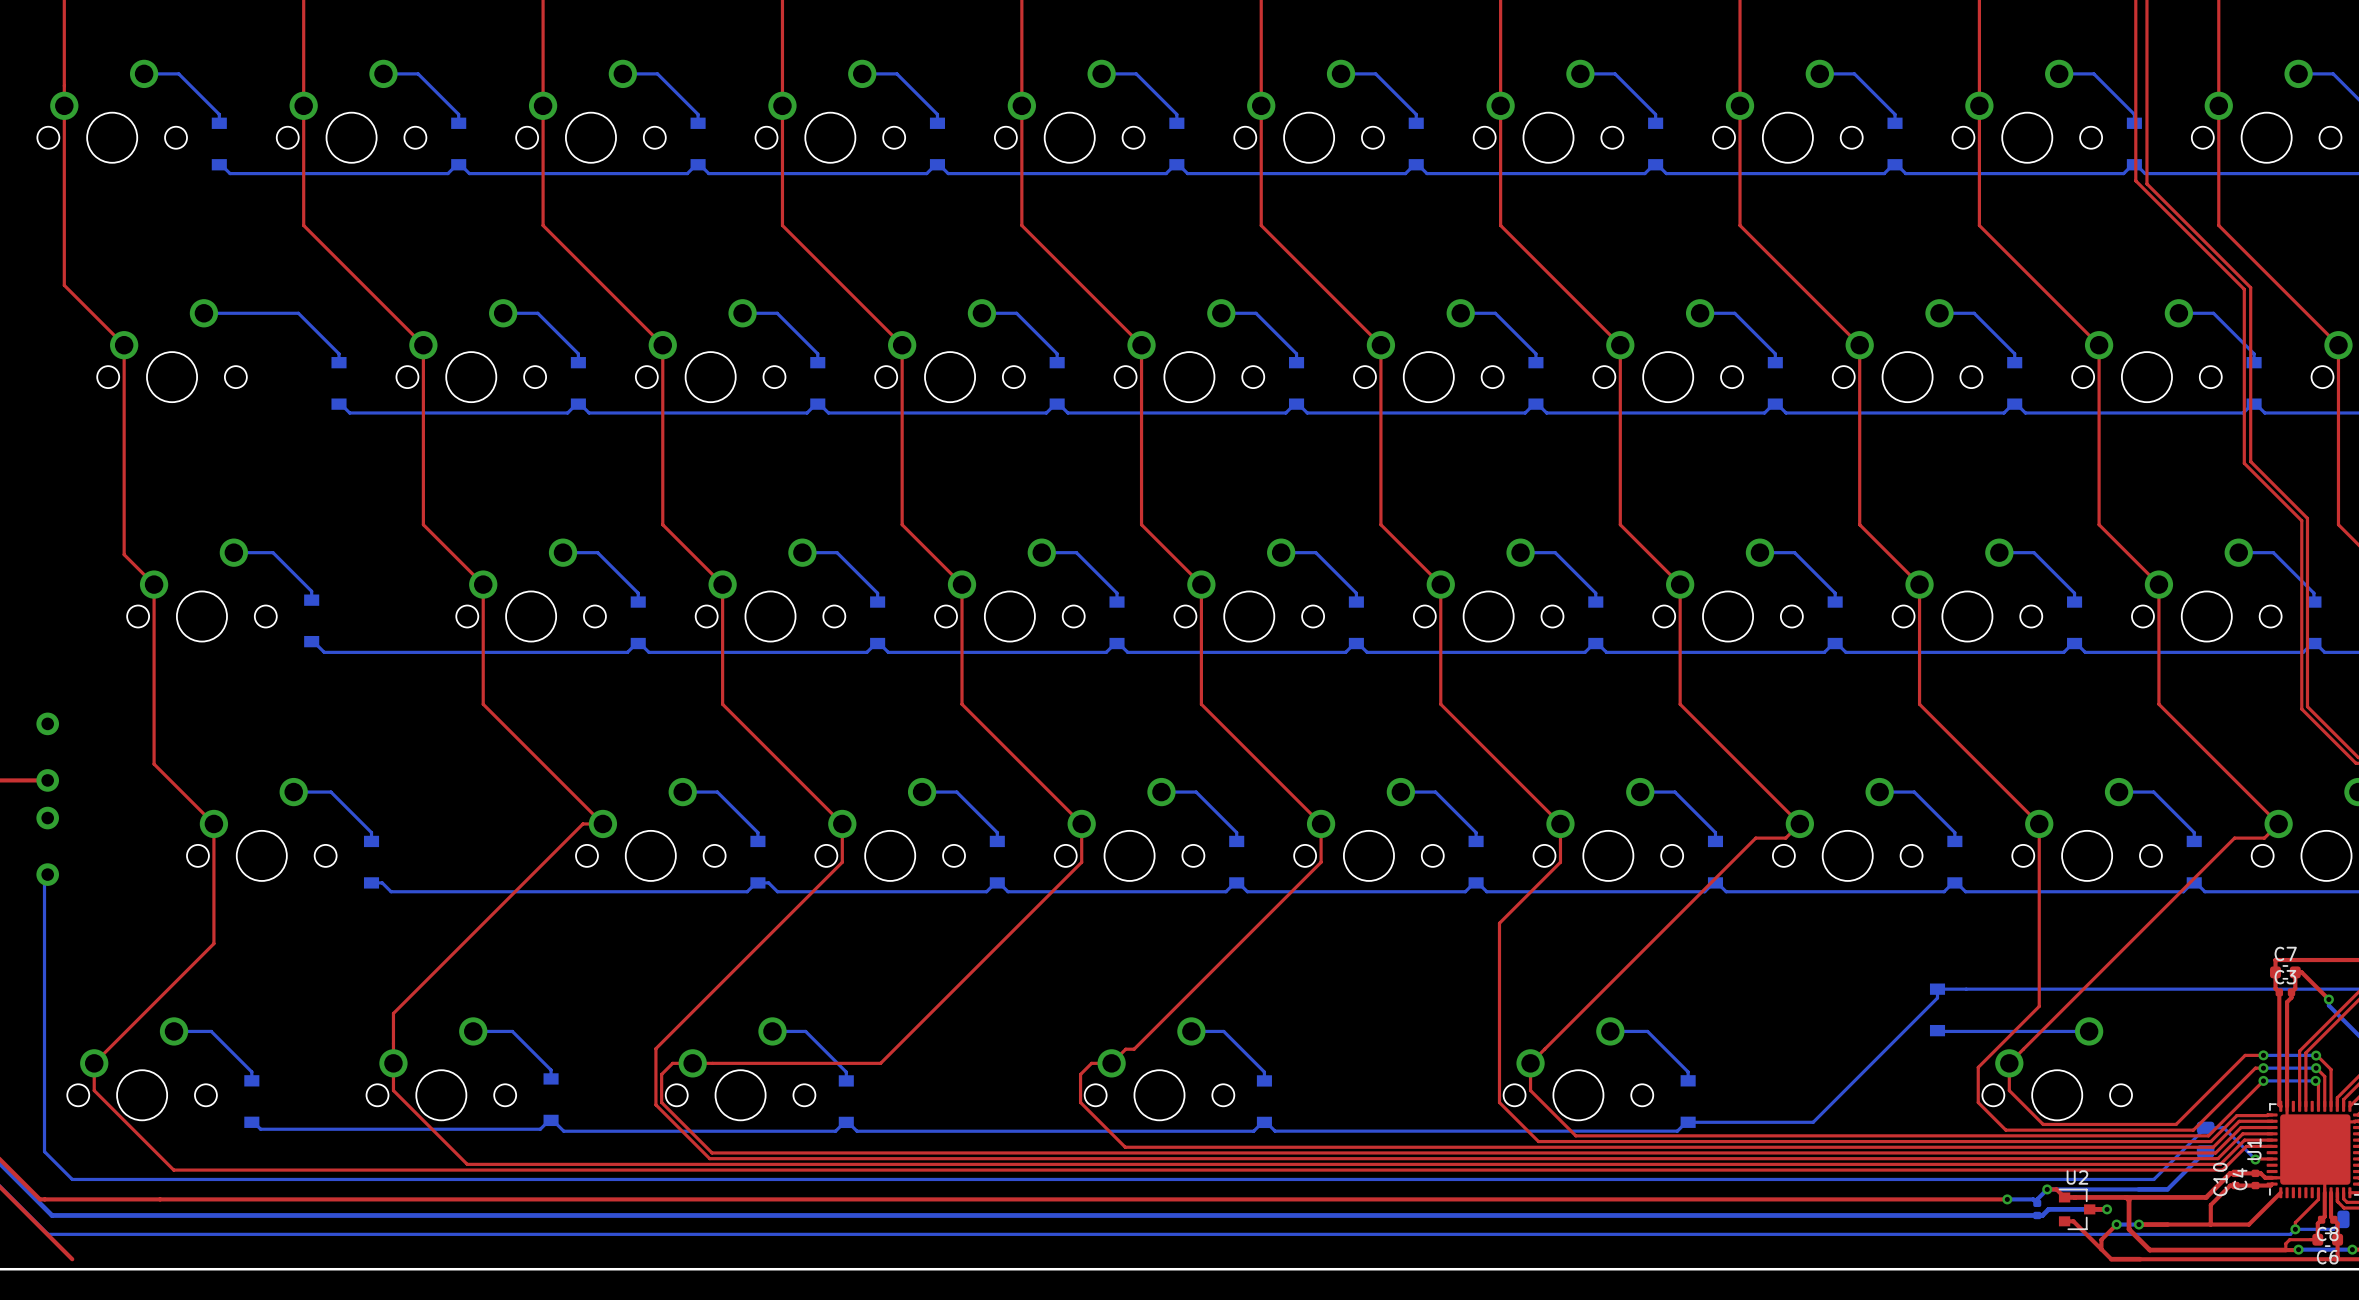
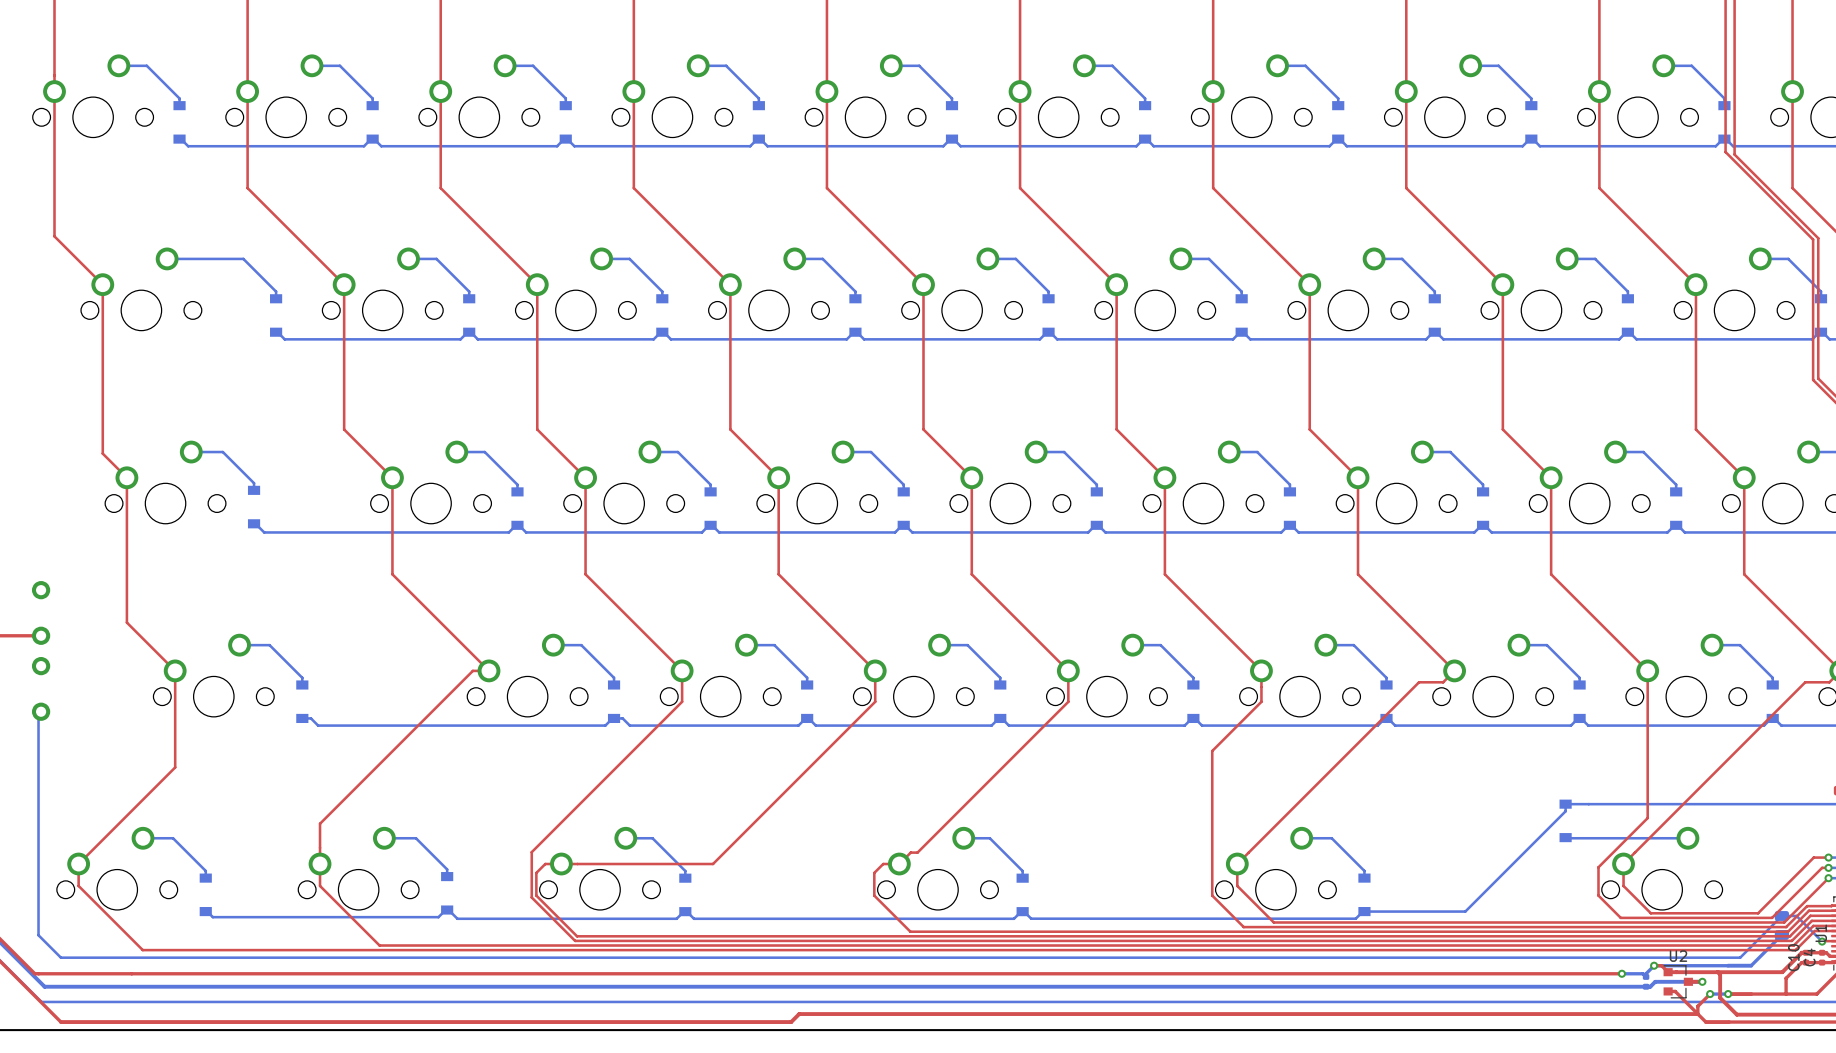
top track: none -> (1697, 1014) (799, 1014) (791, 1022) (60, 1022)

